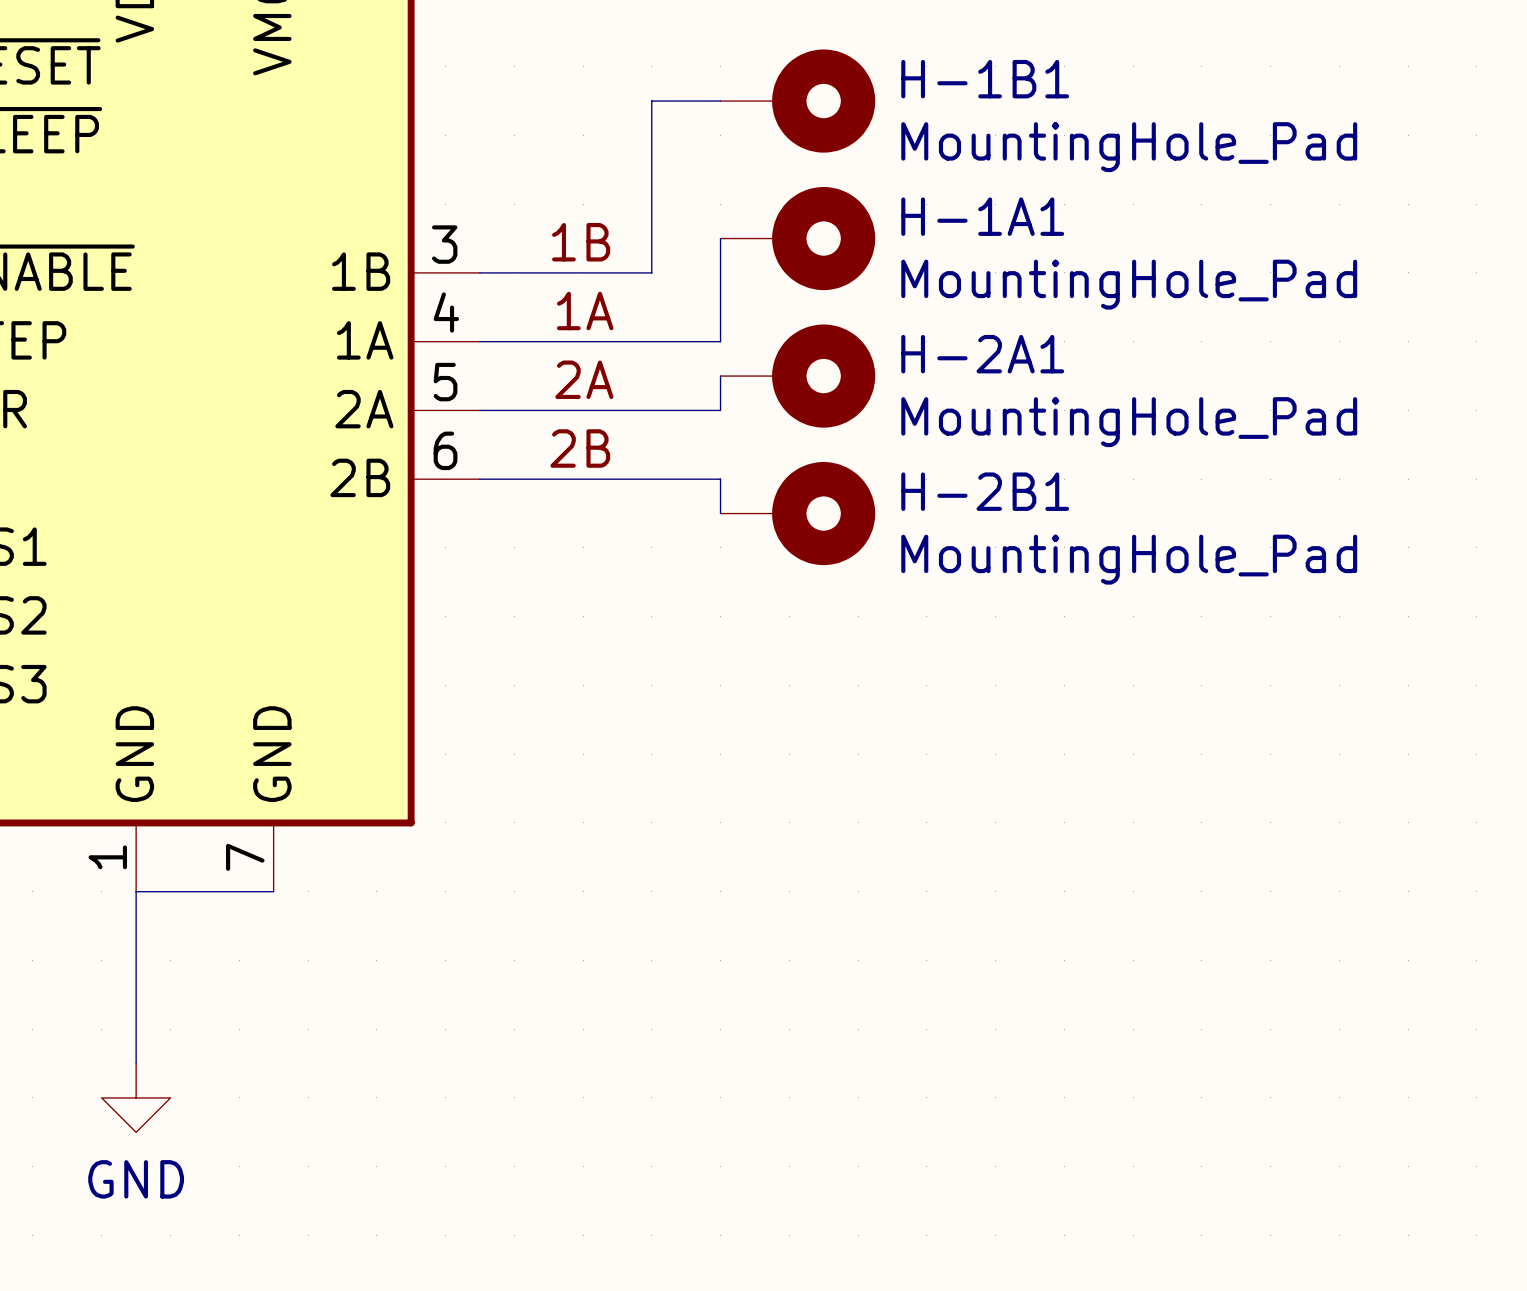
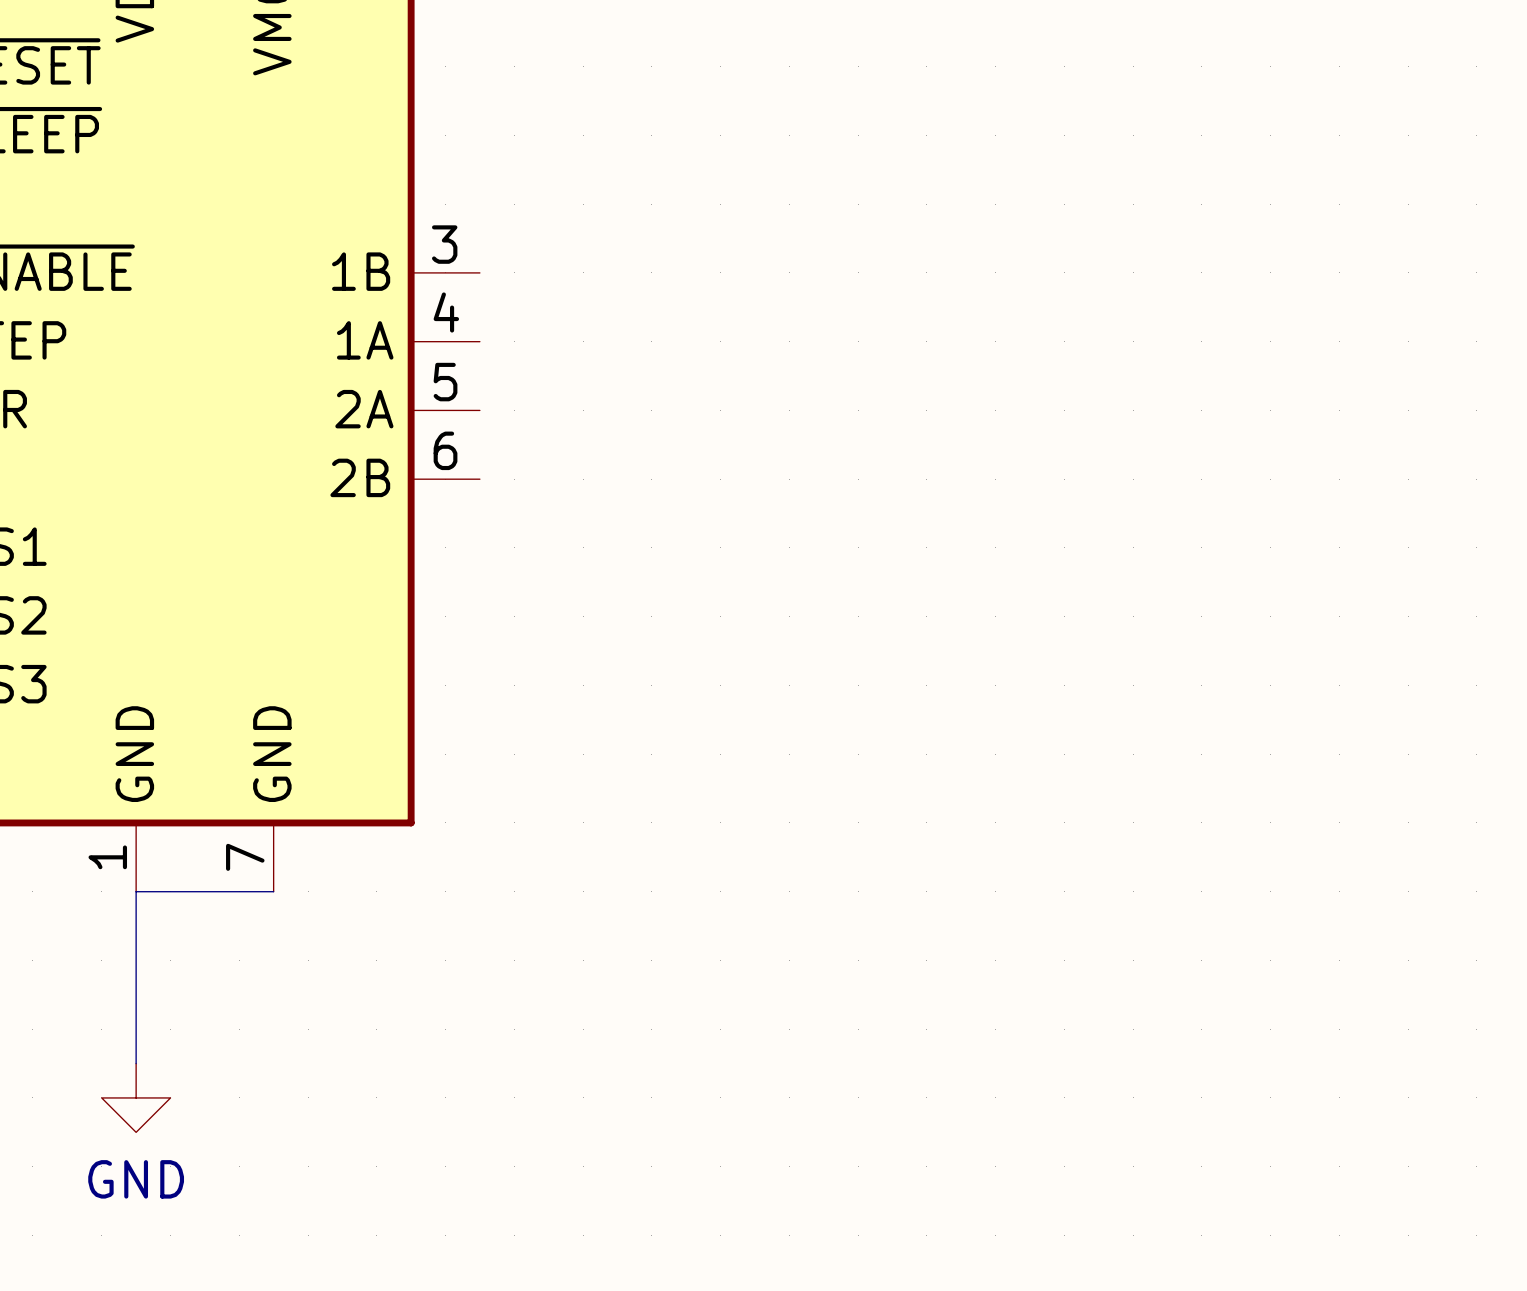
wire: (720, 101) (651, 101) (651, 272) (479, 272) -> none
H-1B1: MountingHole_Pad (797, 101) -> none
wire: (720, 238) (720, 341) (479, 341) -> none
H-1A1: MountingHole_Pad (797, 238) -> none
label: 1B (581, 242) -> none
label: 1A (585, 311) -> none
wire: (720, 376) (720, 410) (479, 410) -> none
H-2A1: MountingHole_Pad (797, 376) -> none
label: 2A (584, 379) -> none
label: 2B (580, 448) -> none
wire: (479, 479) (720, 479) (720, 513) -> none
H-2B1: MountingHole_Pad (797, 513) -> none

